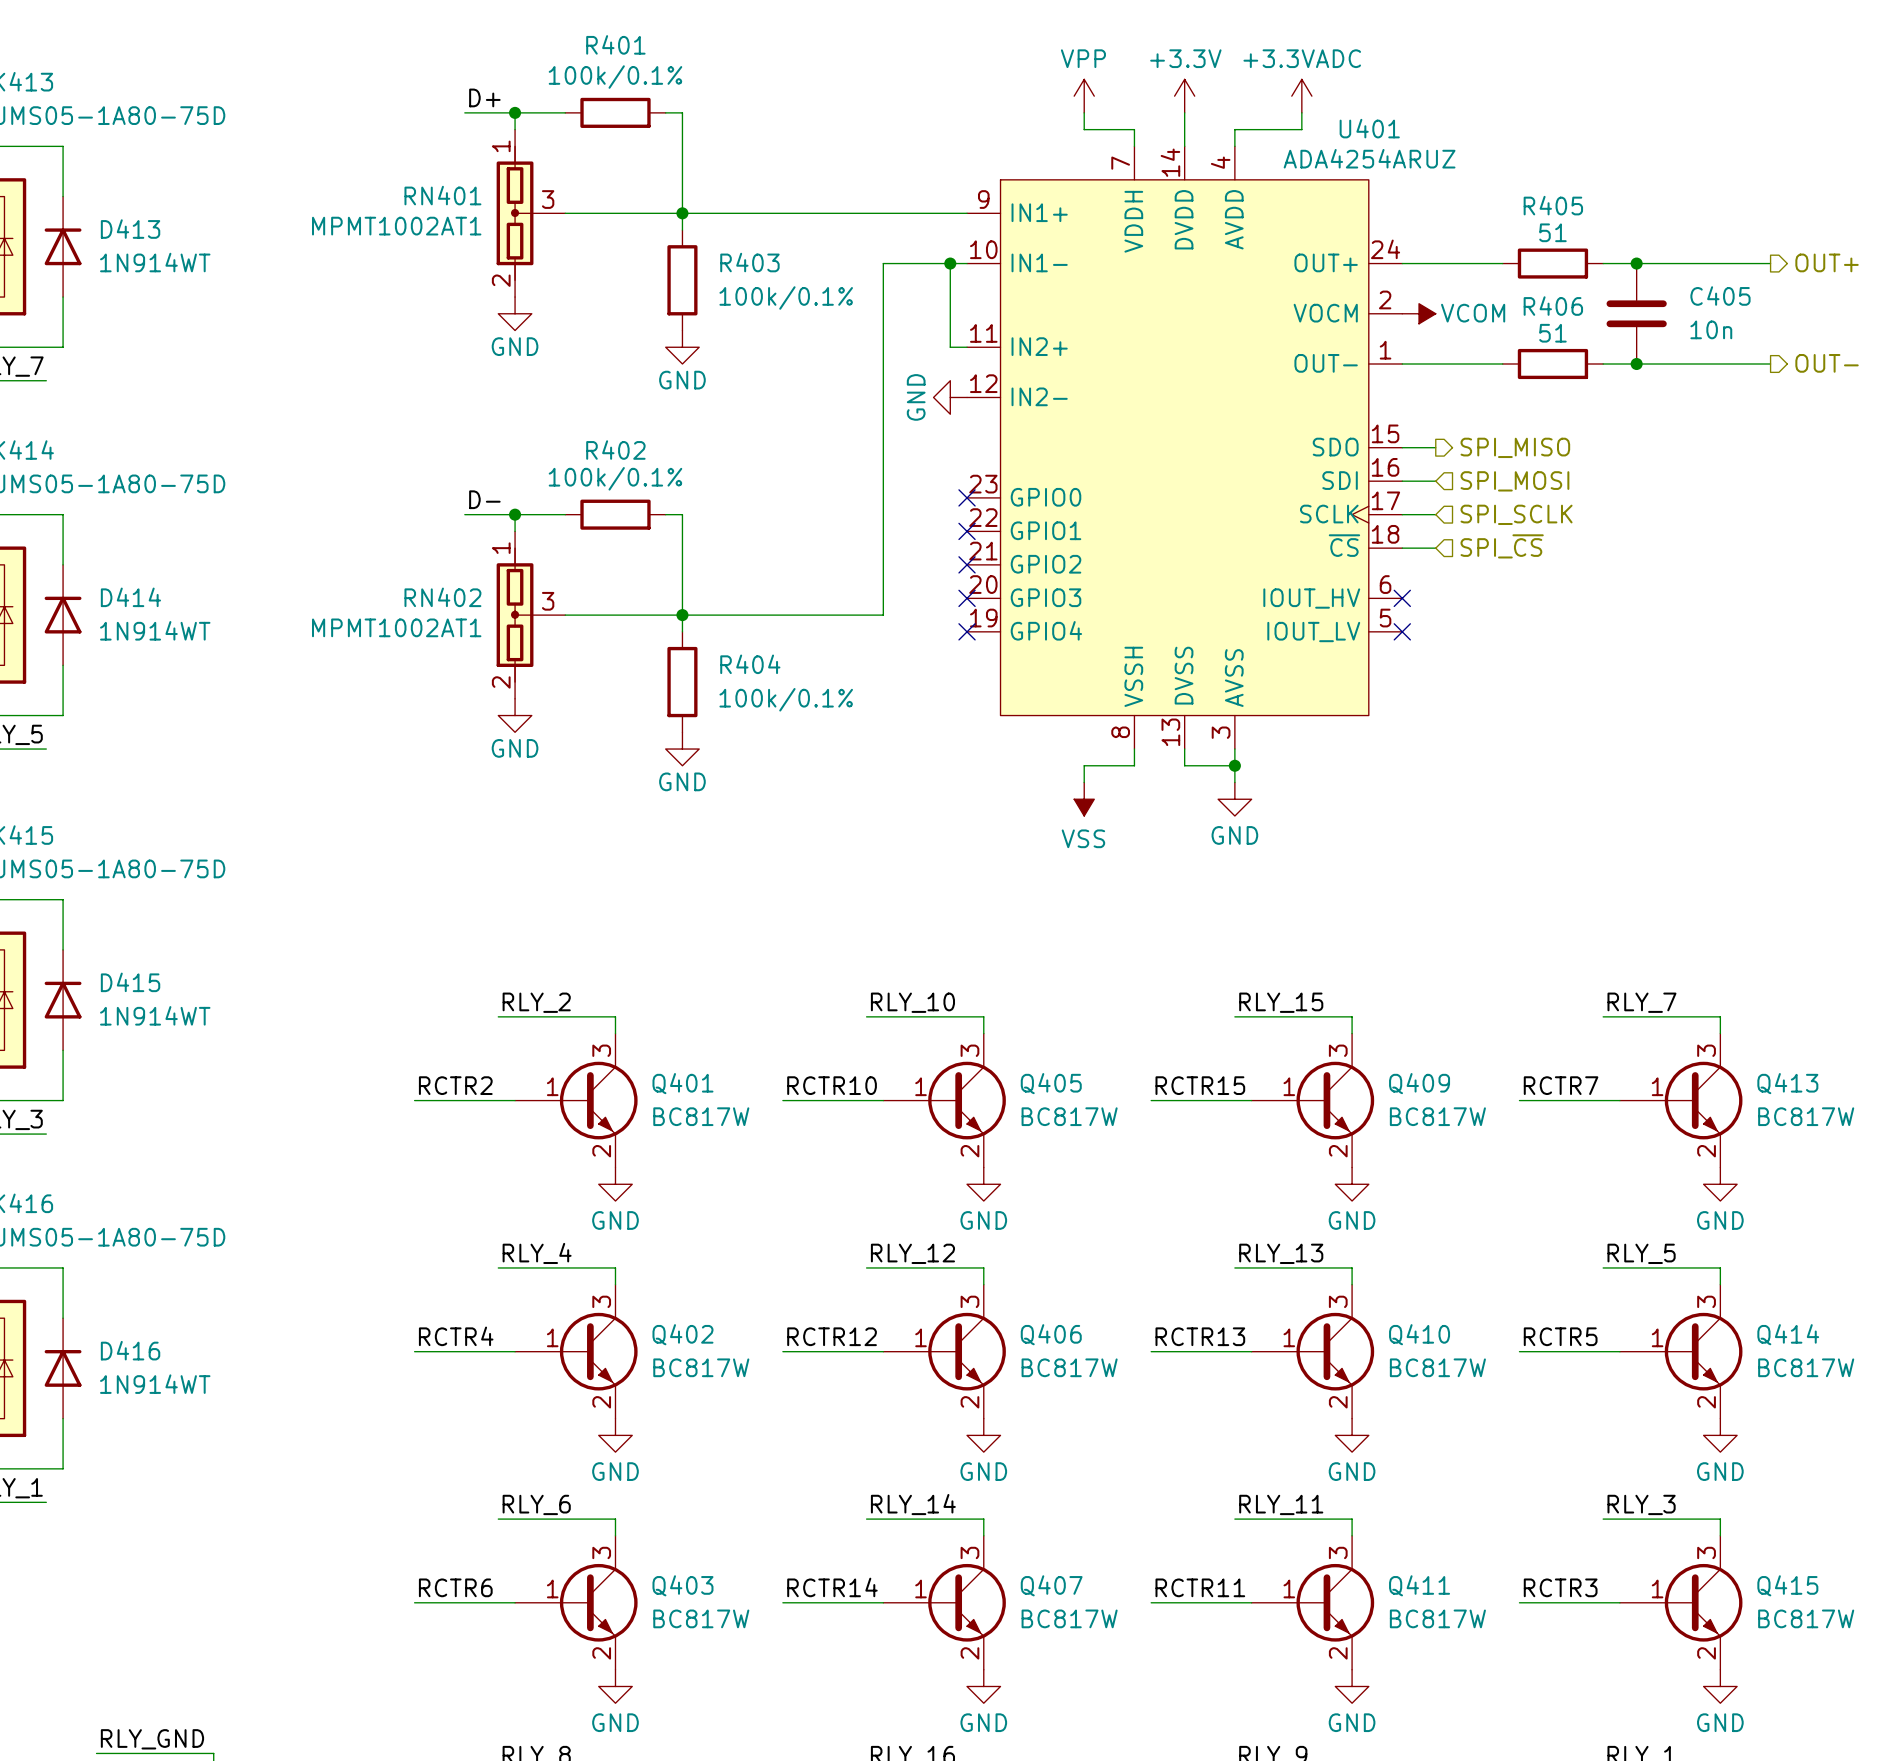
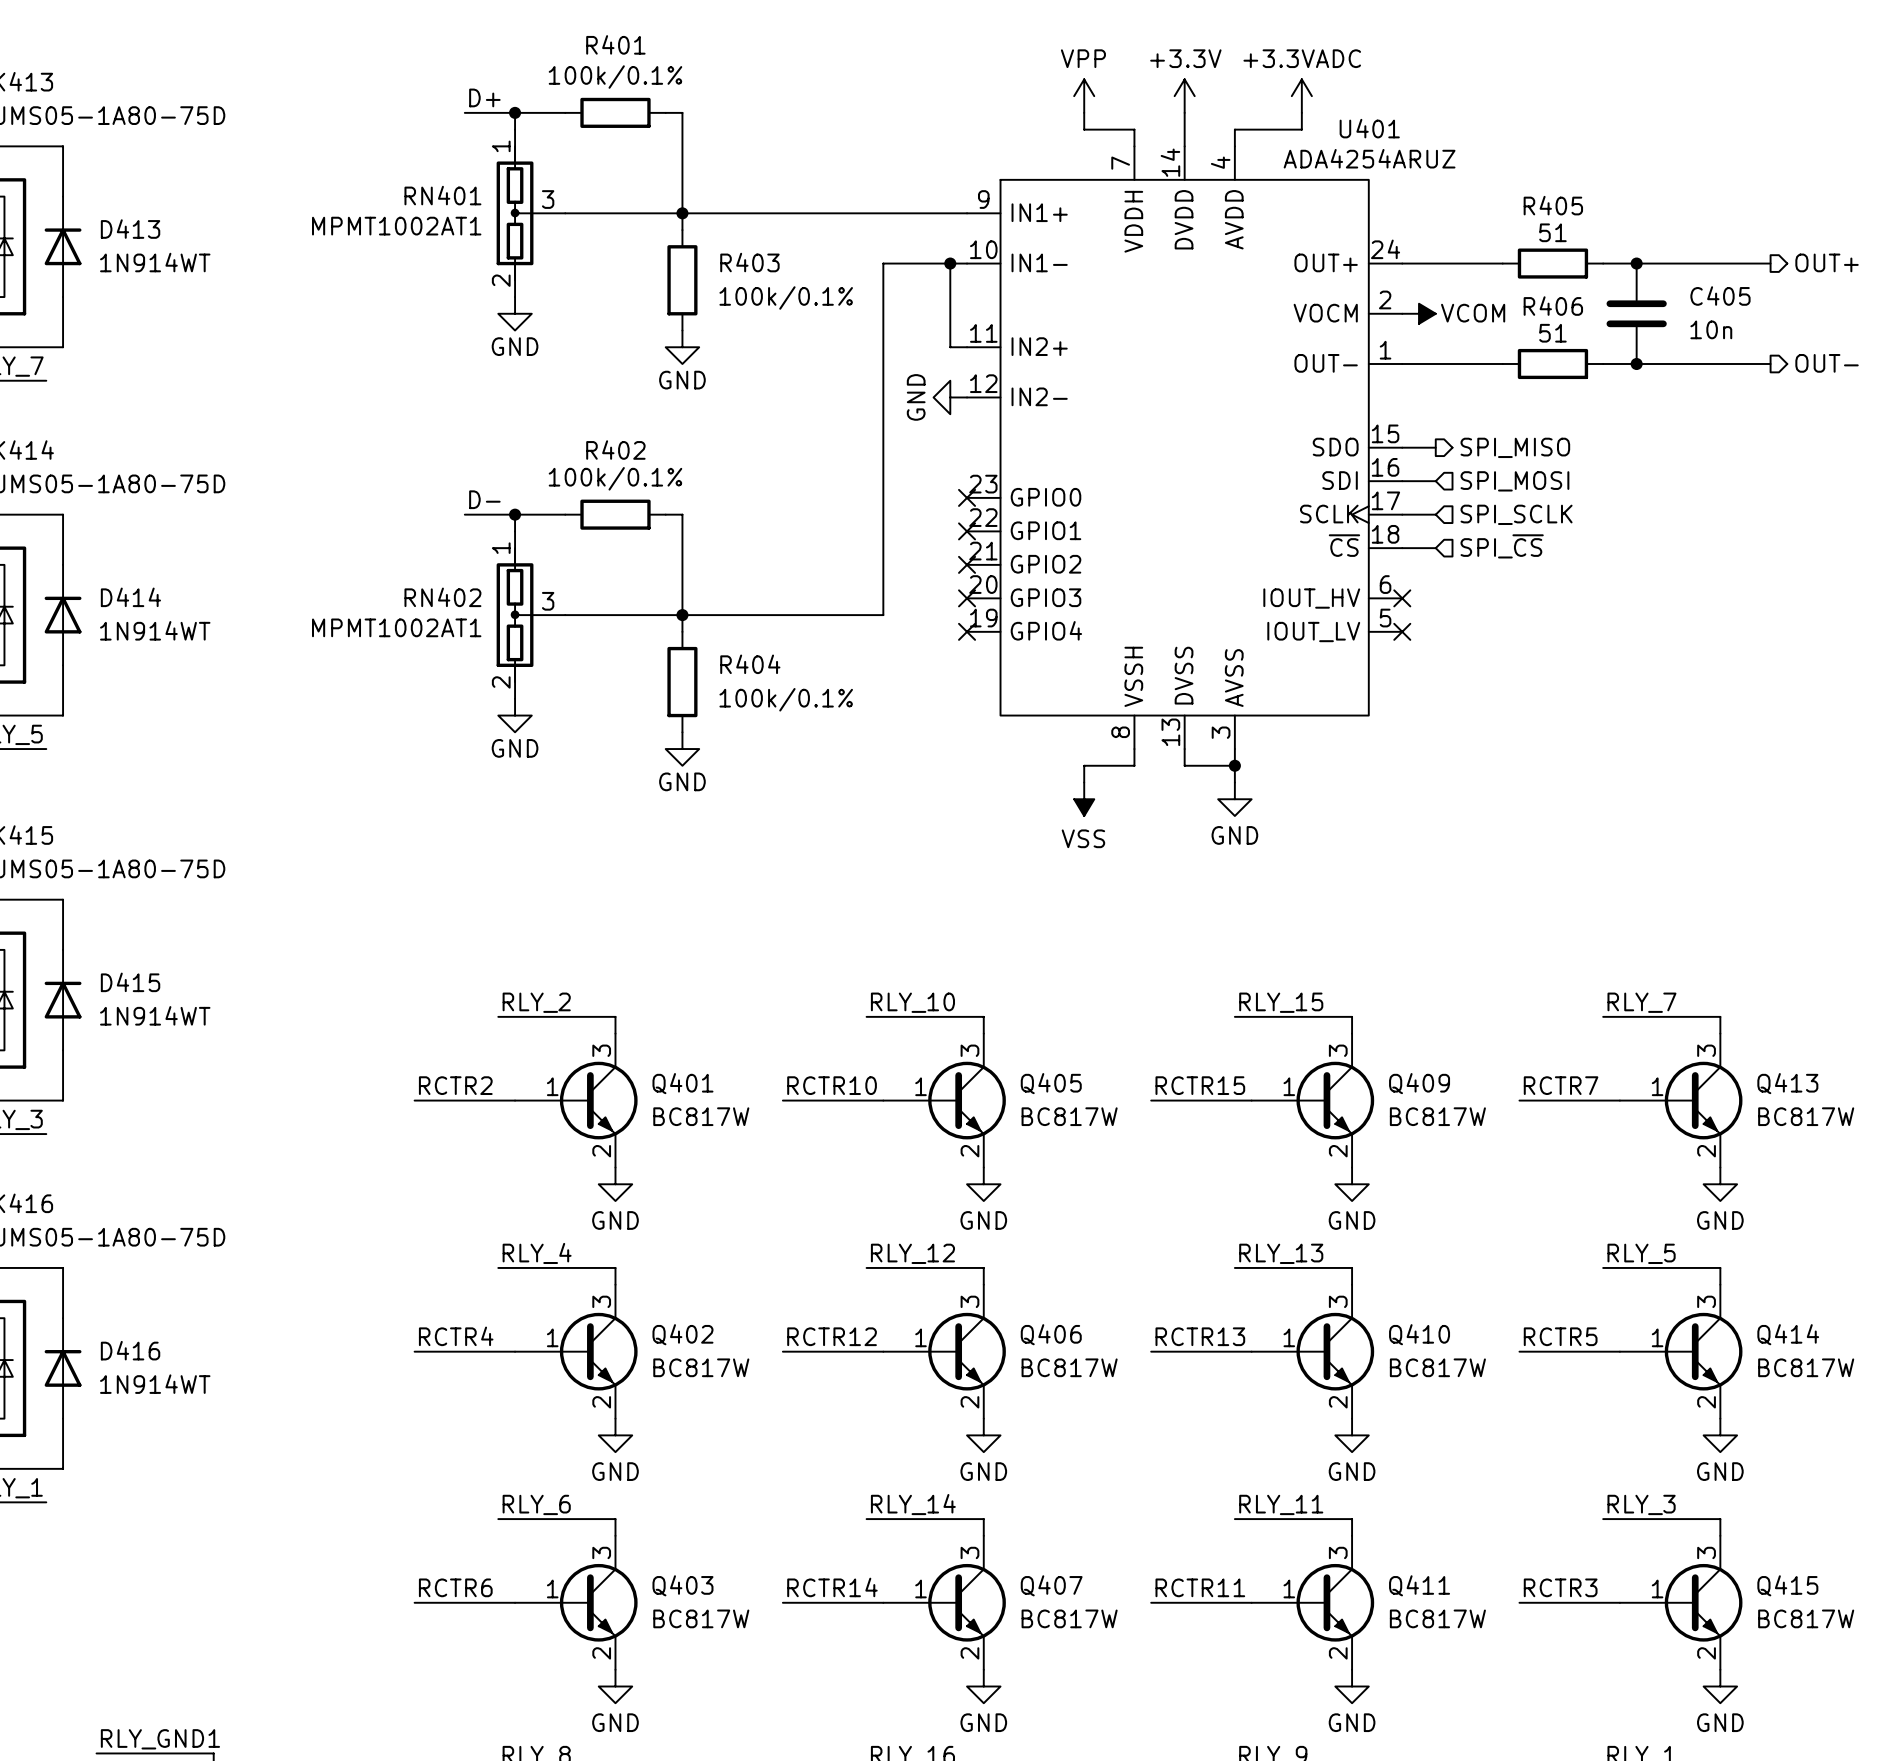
label: RLY_GND (152, 1739) -> RLY_GND1 (160, 1739)

